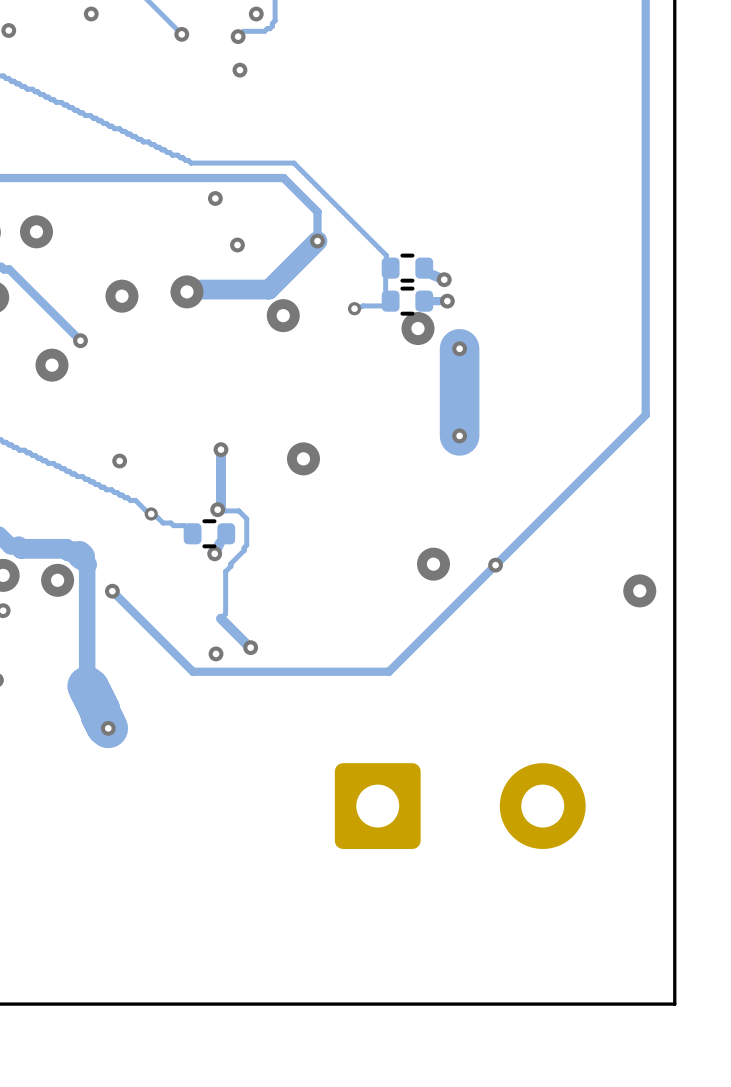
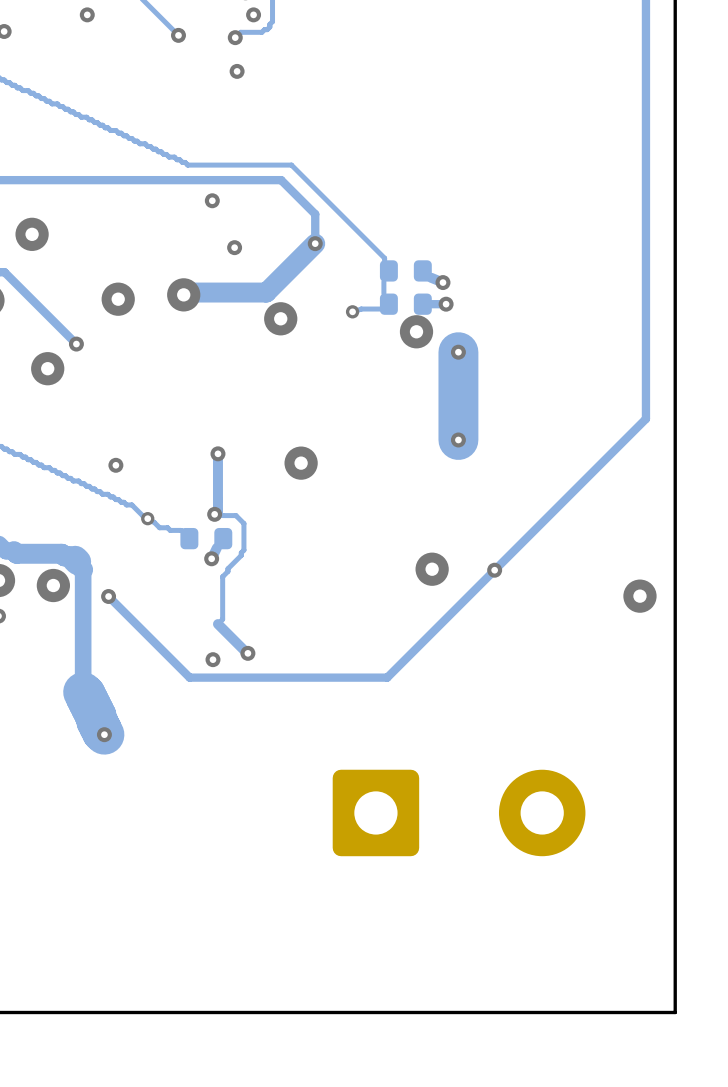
part footprint: [381, 253, 434, 283] -> [379, 260, 432, 282]
part footprint: [381, 286, 434, 316] -> [379, 293, 432, 315]
part footprint: [183, 519, 236, 549] -> [180, 527, 233, 550]

